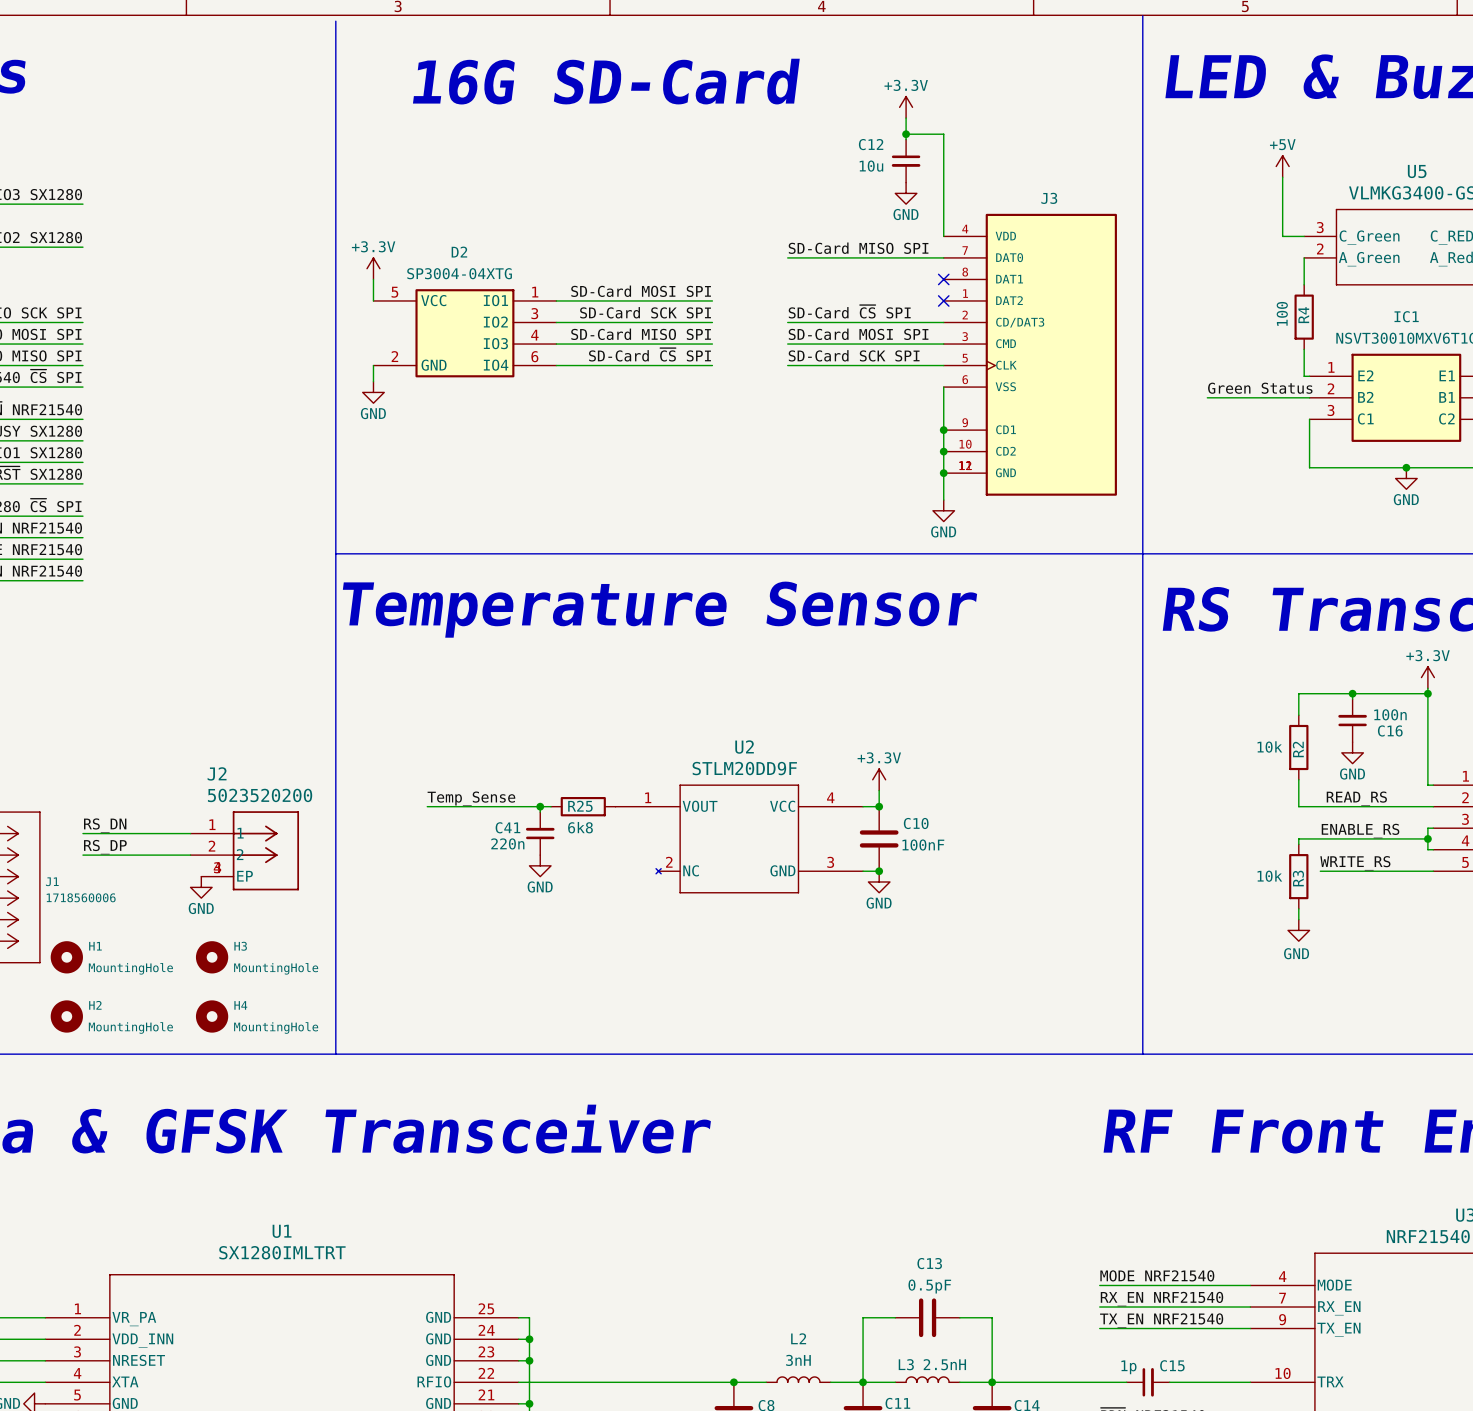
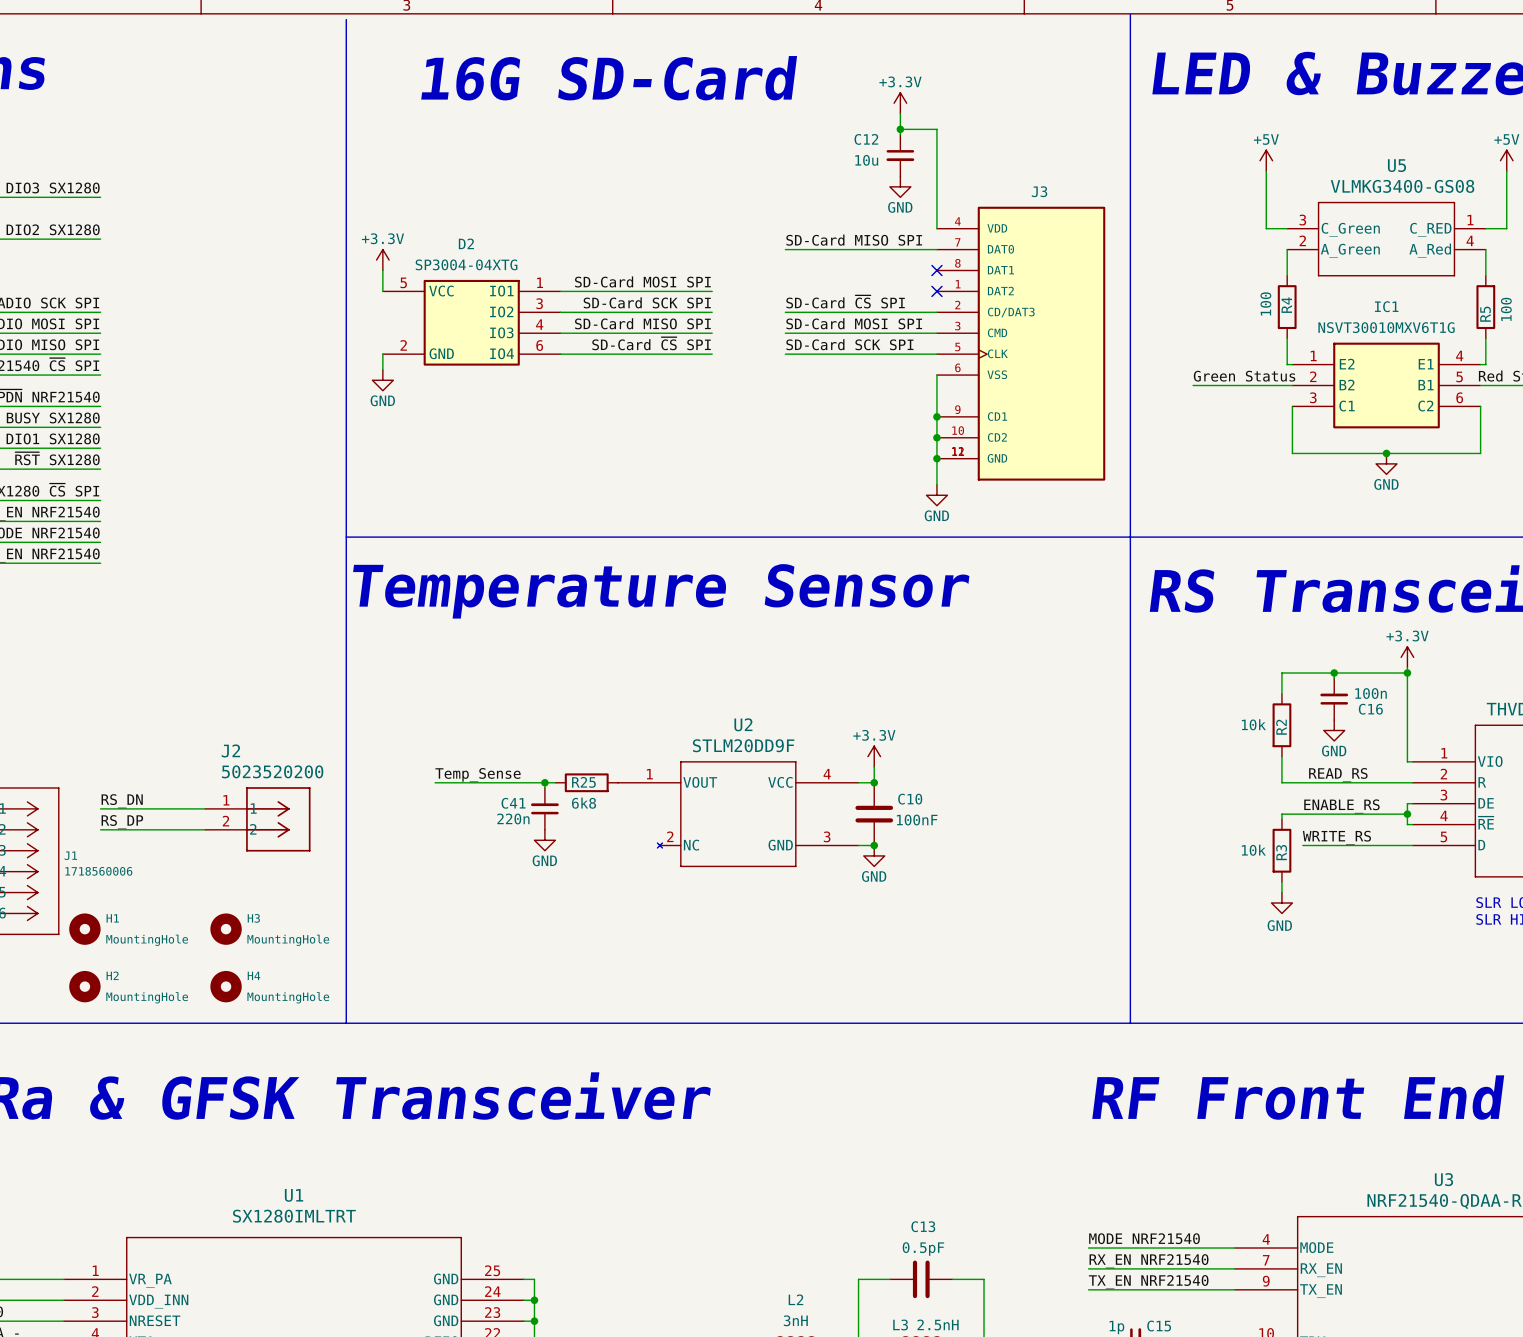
J2 symbol: [190, 811, 300, 891] -> [205, 787, 311, 852]
power symbol: GND (201, 887) -> none

